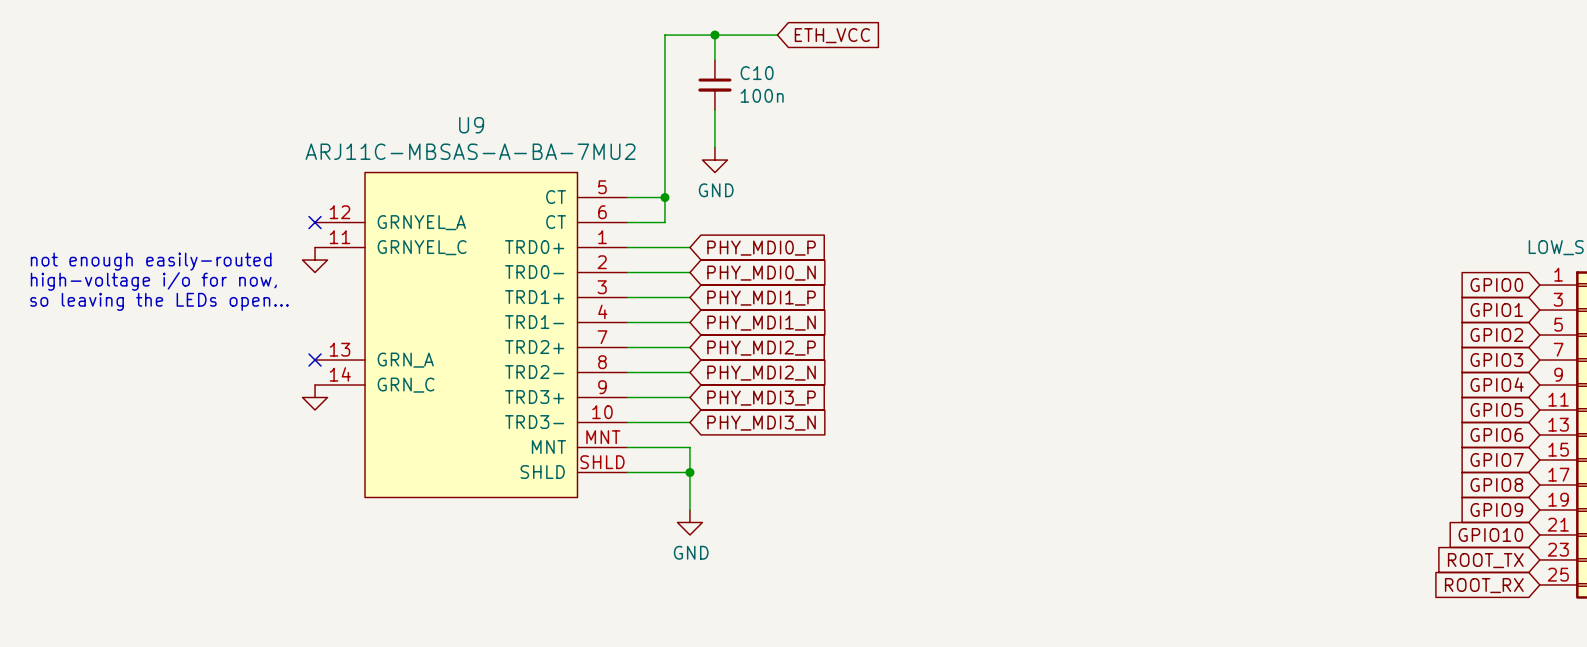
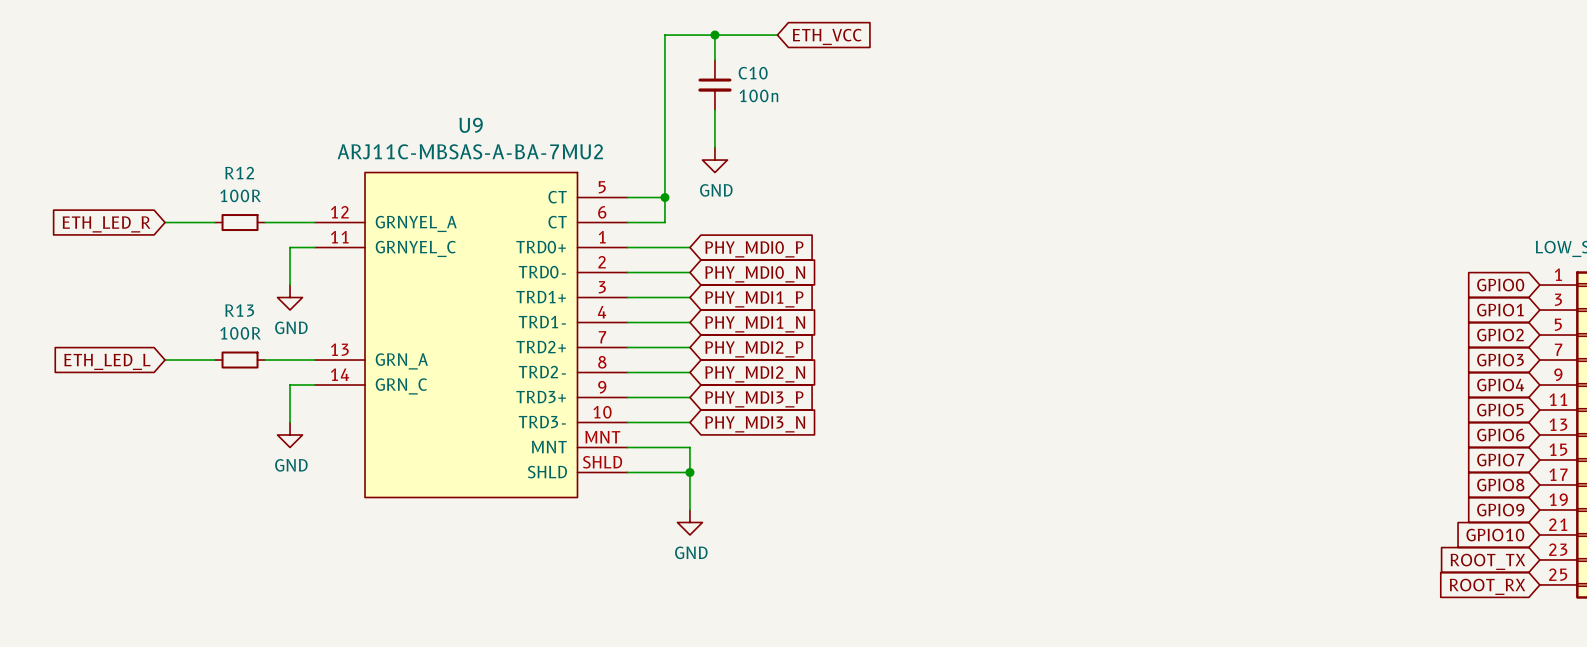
wire: none -> (165, 222) (215, 222)
R12: none -> 100R (240, 222)
wire: none -> (265, 222) (315, 222)
no-connect mark: (315, 222) -> none
global label: none -> ETH_LED_R (106, 224)
wire: none -> (315, 247) (290, 247) (290, 285)
power symbol: (315, 260) -> none
text: not enough easily-routed (151, 261) -> none
text: high-voltage i/o for now, (153, 281) -> none
power symbol: none -> GND (290, 297)
text: so leaving the LEDs open... (159, 301) -> none
global label: none -> ETH_LED_L (107, 361)
wire: none -> (165, 360) (215, 360)
R13: none -> 100R (240, 360)
wire: none -> (265, 360) (315, 360)
no-connect mark: (315, 360) -> none
wire: none -> (315, 385) (290, 385) (290, 422)
power symbol: (315, 397) -> none
power symbol: none -> GND (290, 435)

